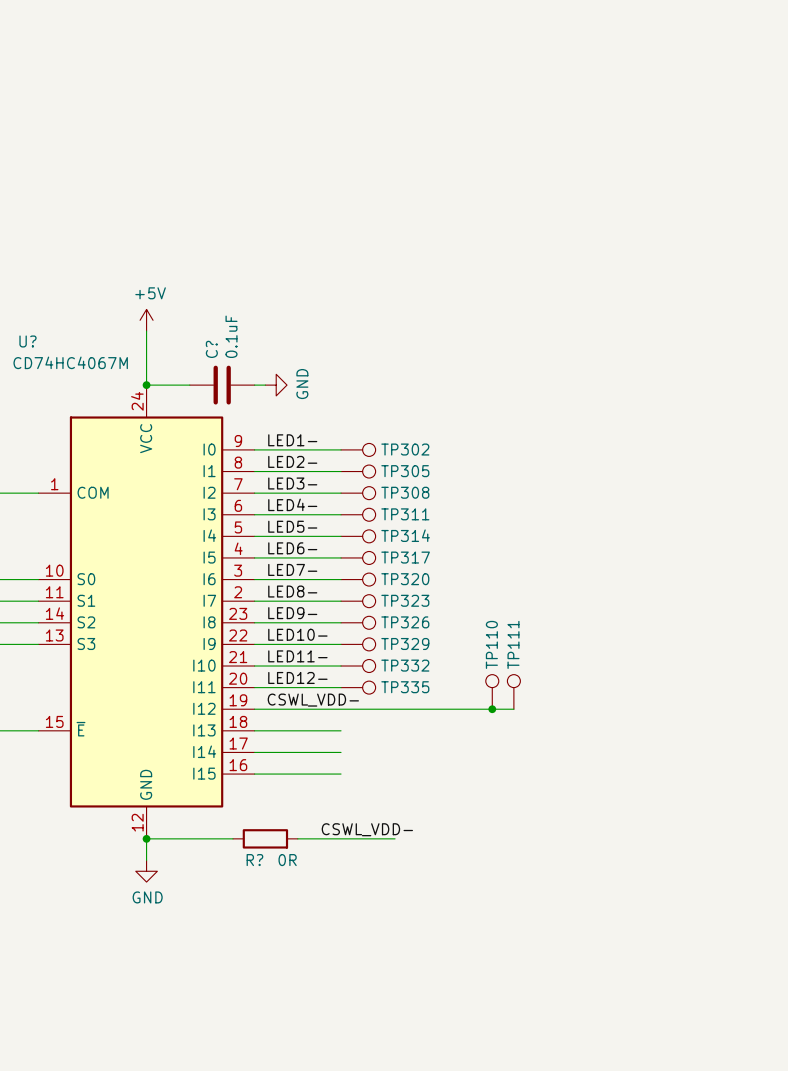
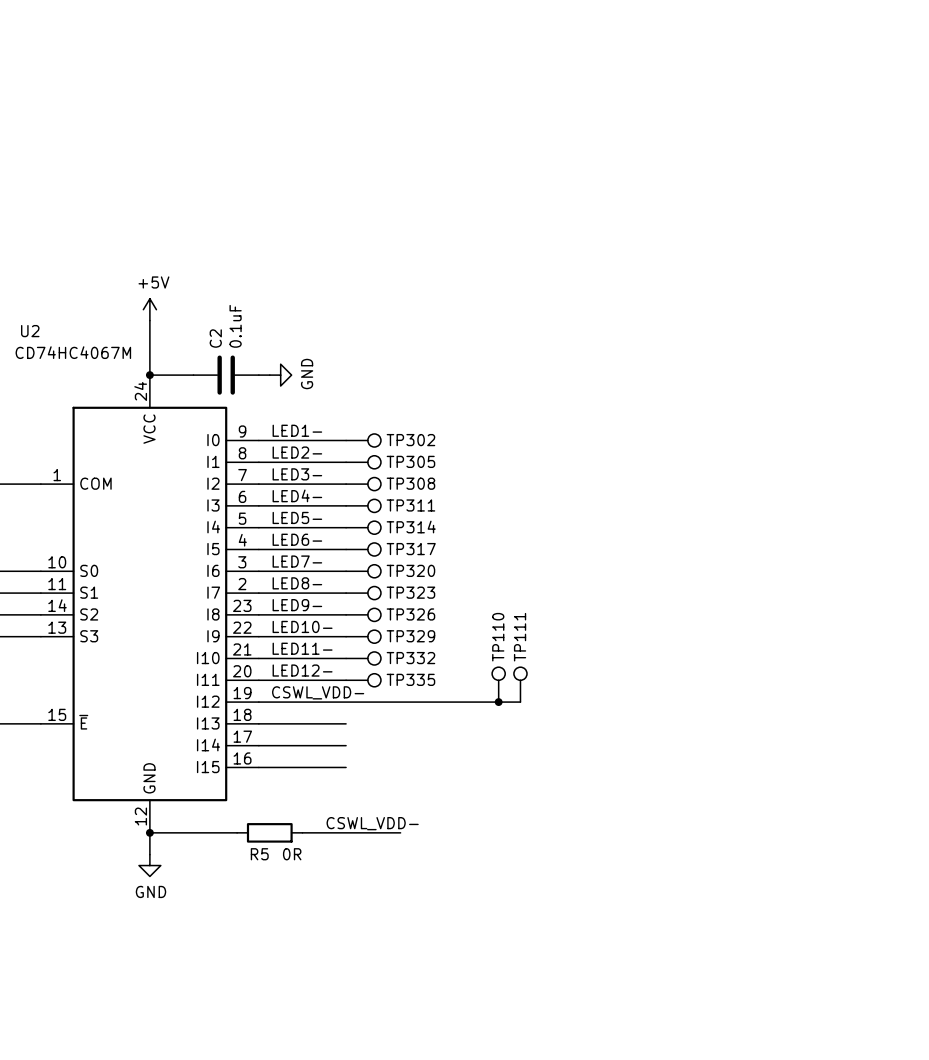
U? name: U? (27, 341) -> U2 (30, 331)
C? name: C? (211, 349) -> C2 (215, 338)
R? name: R? (254, 860) -> R5 (259, 854)

